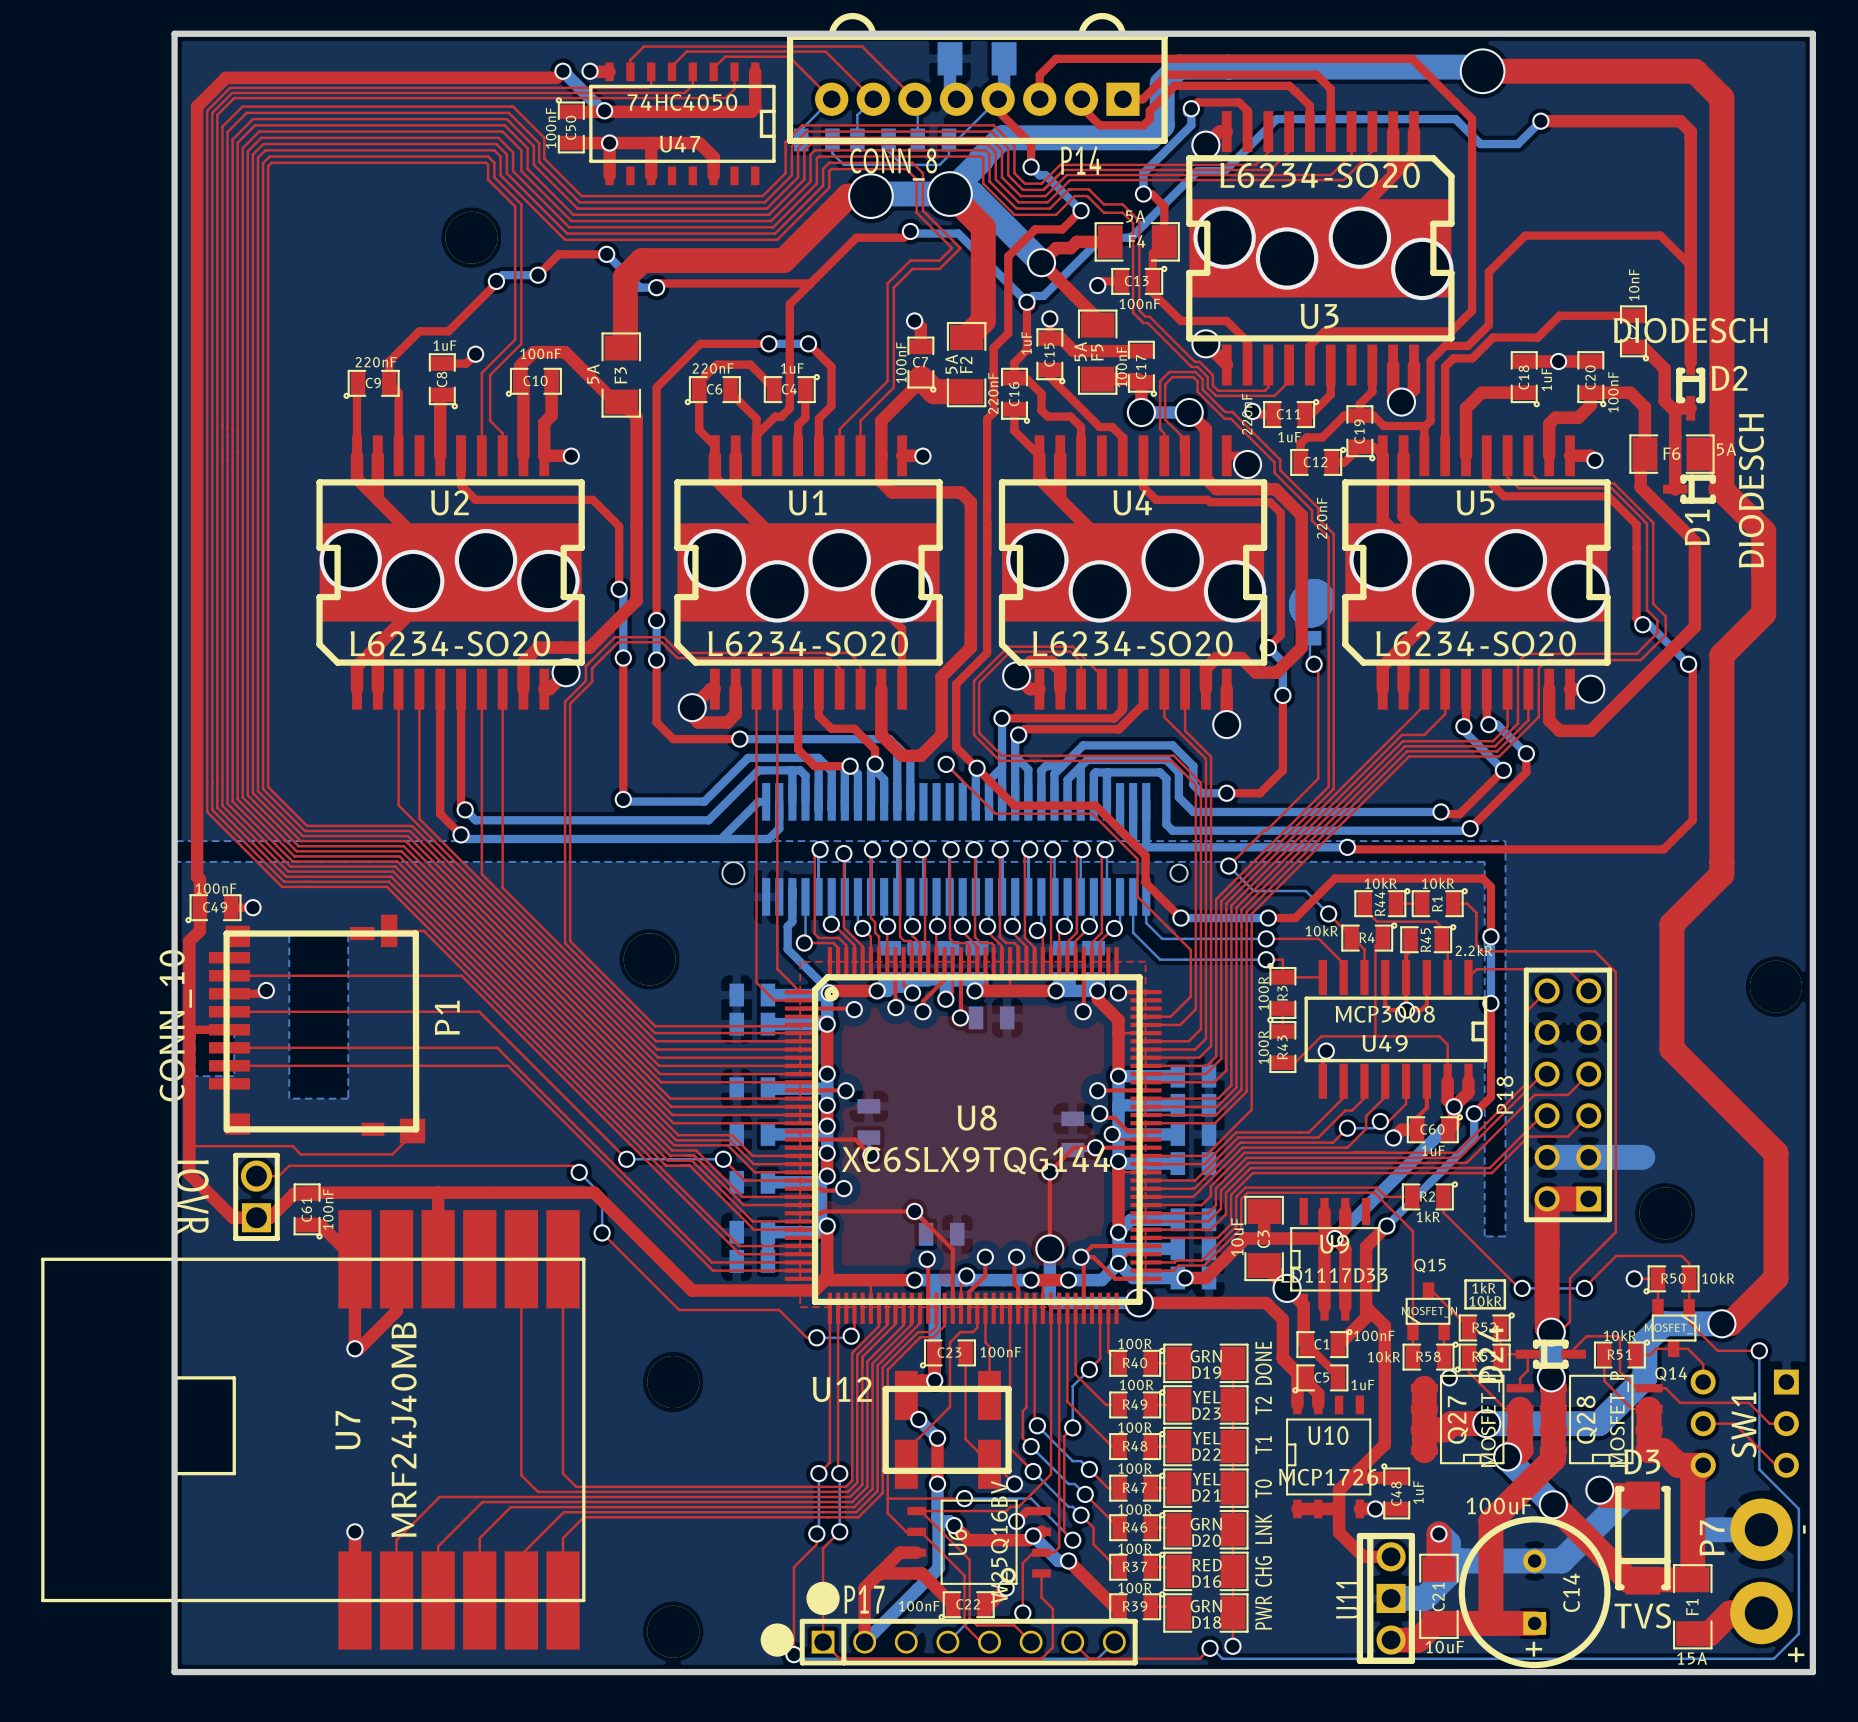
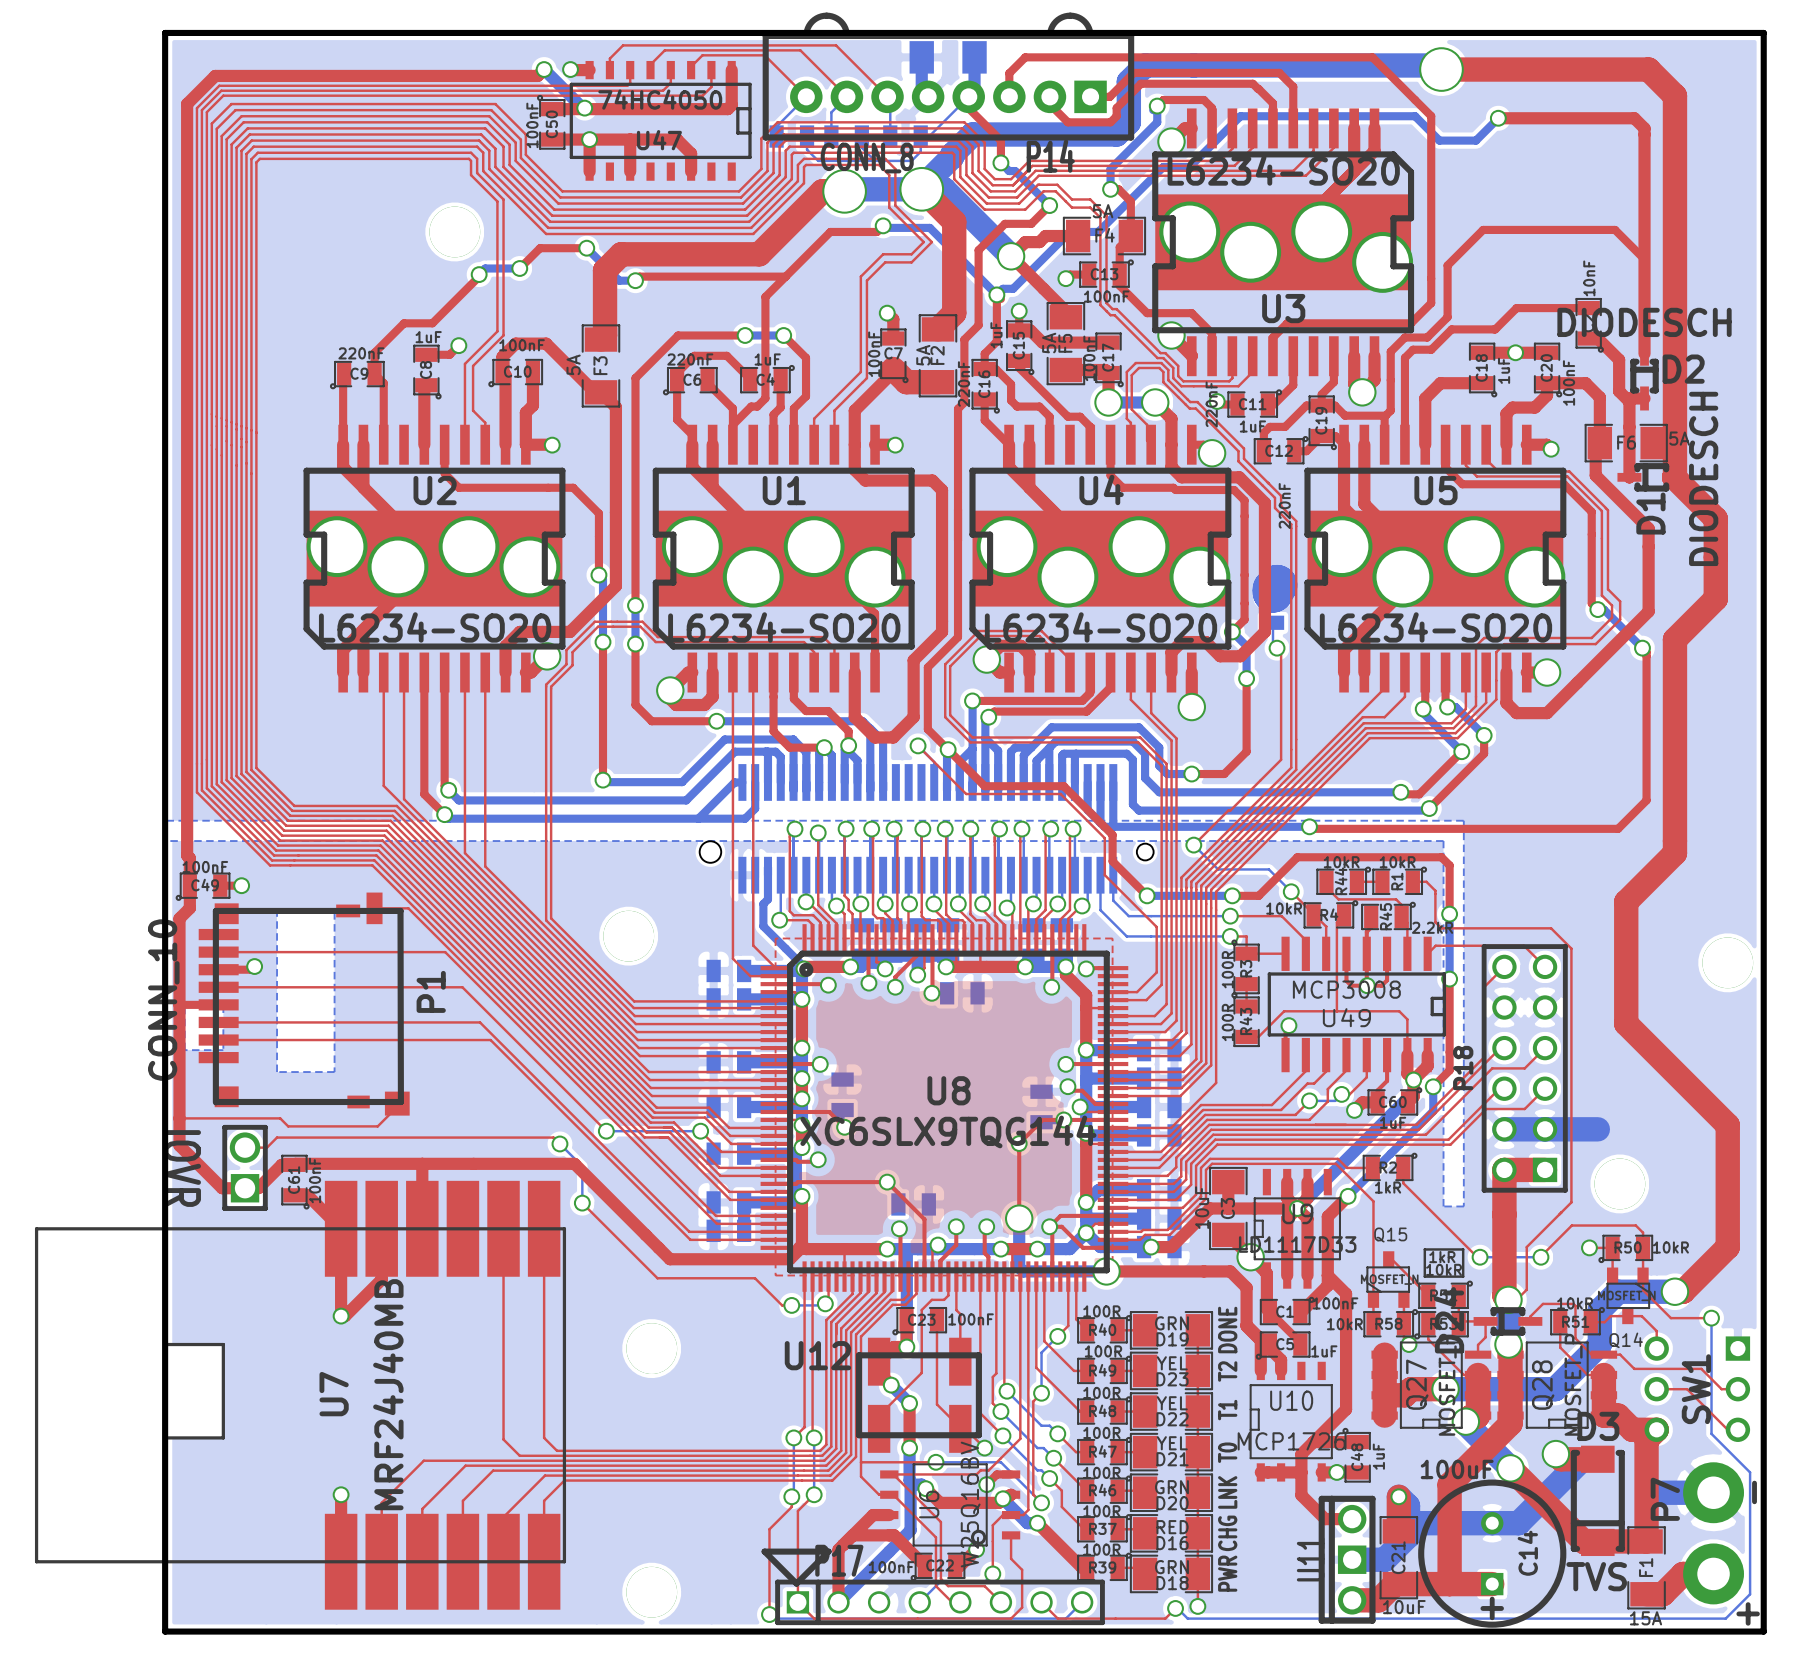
drawing: [760, 1581, 840, 1657] -> none
line: none -> (764, 1551) (828, 1551) (796, 1583) (764, 1551)

